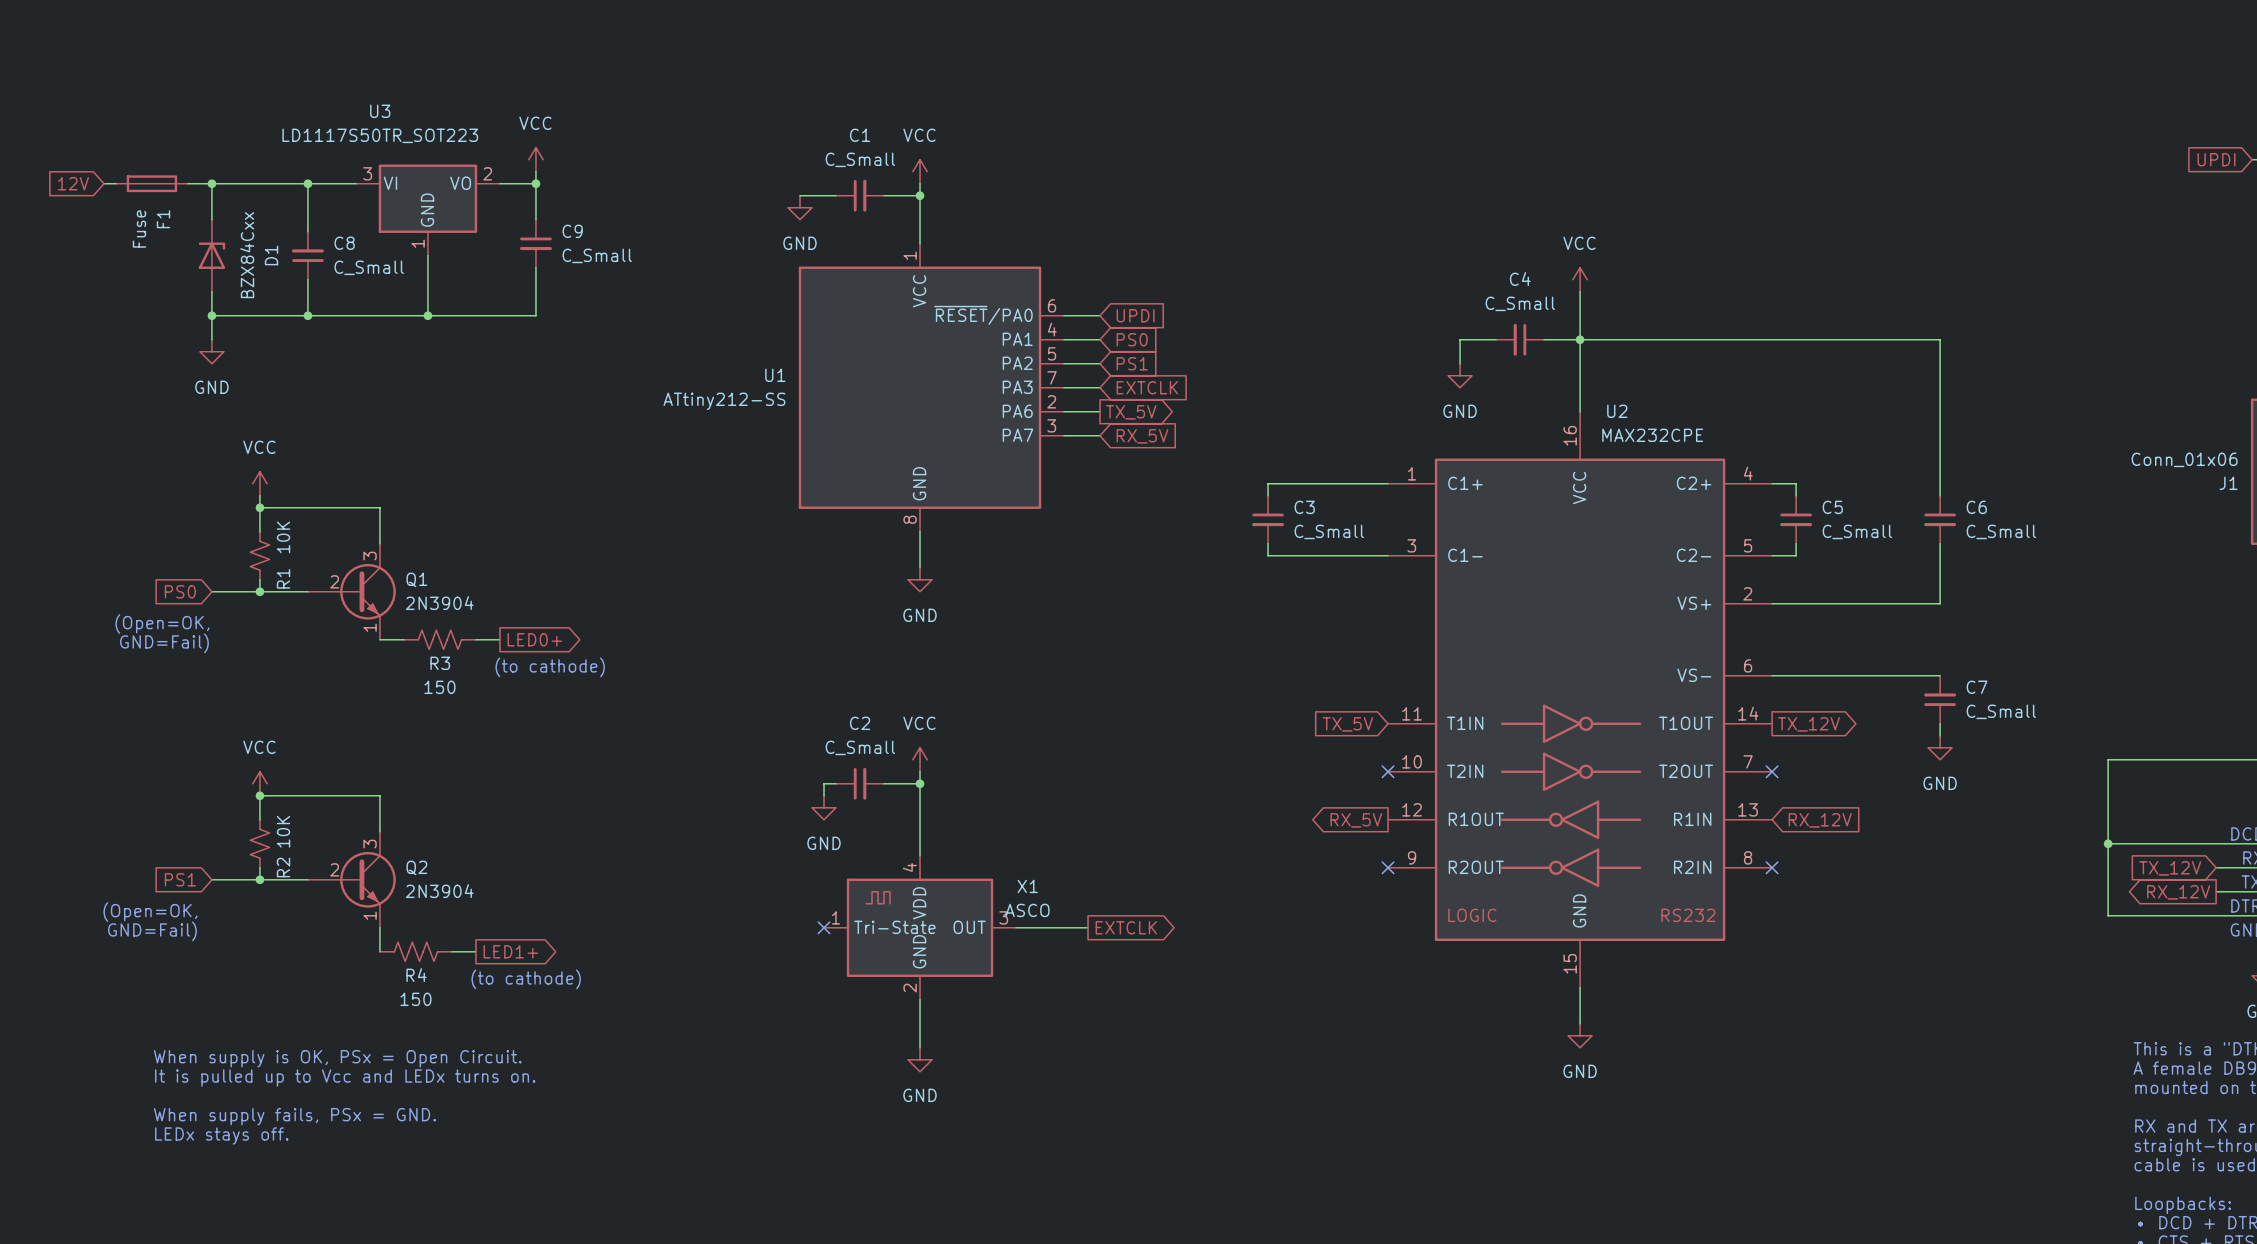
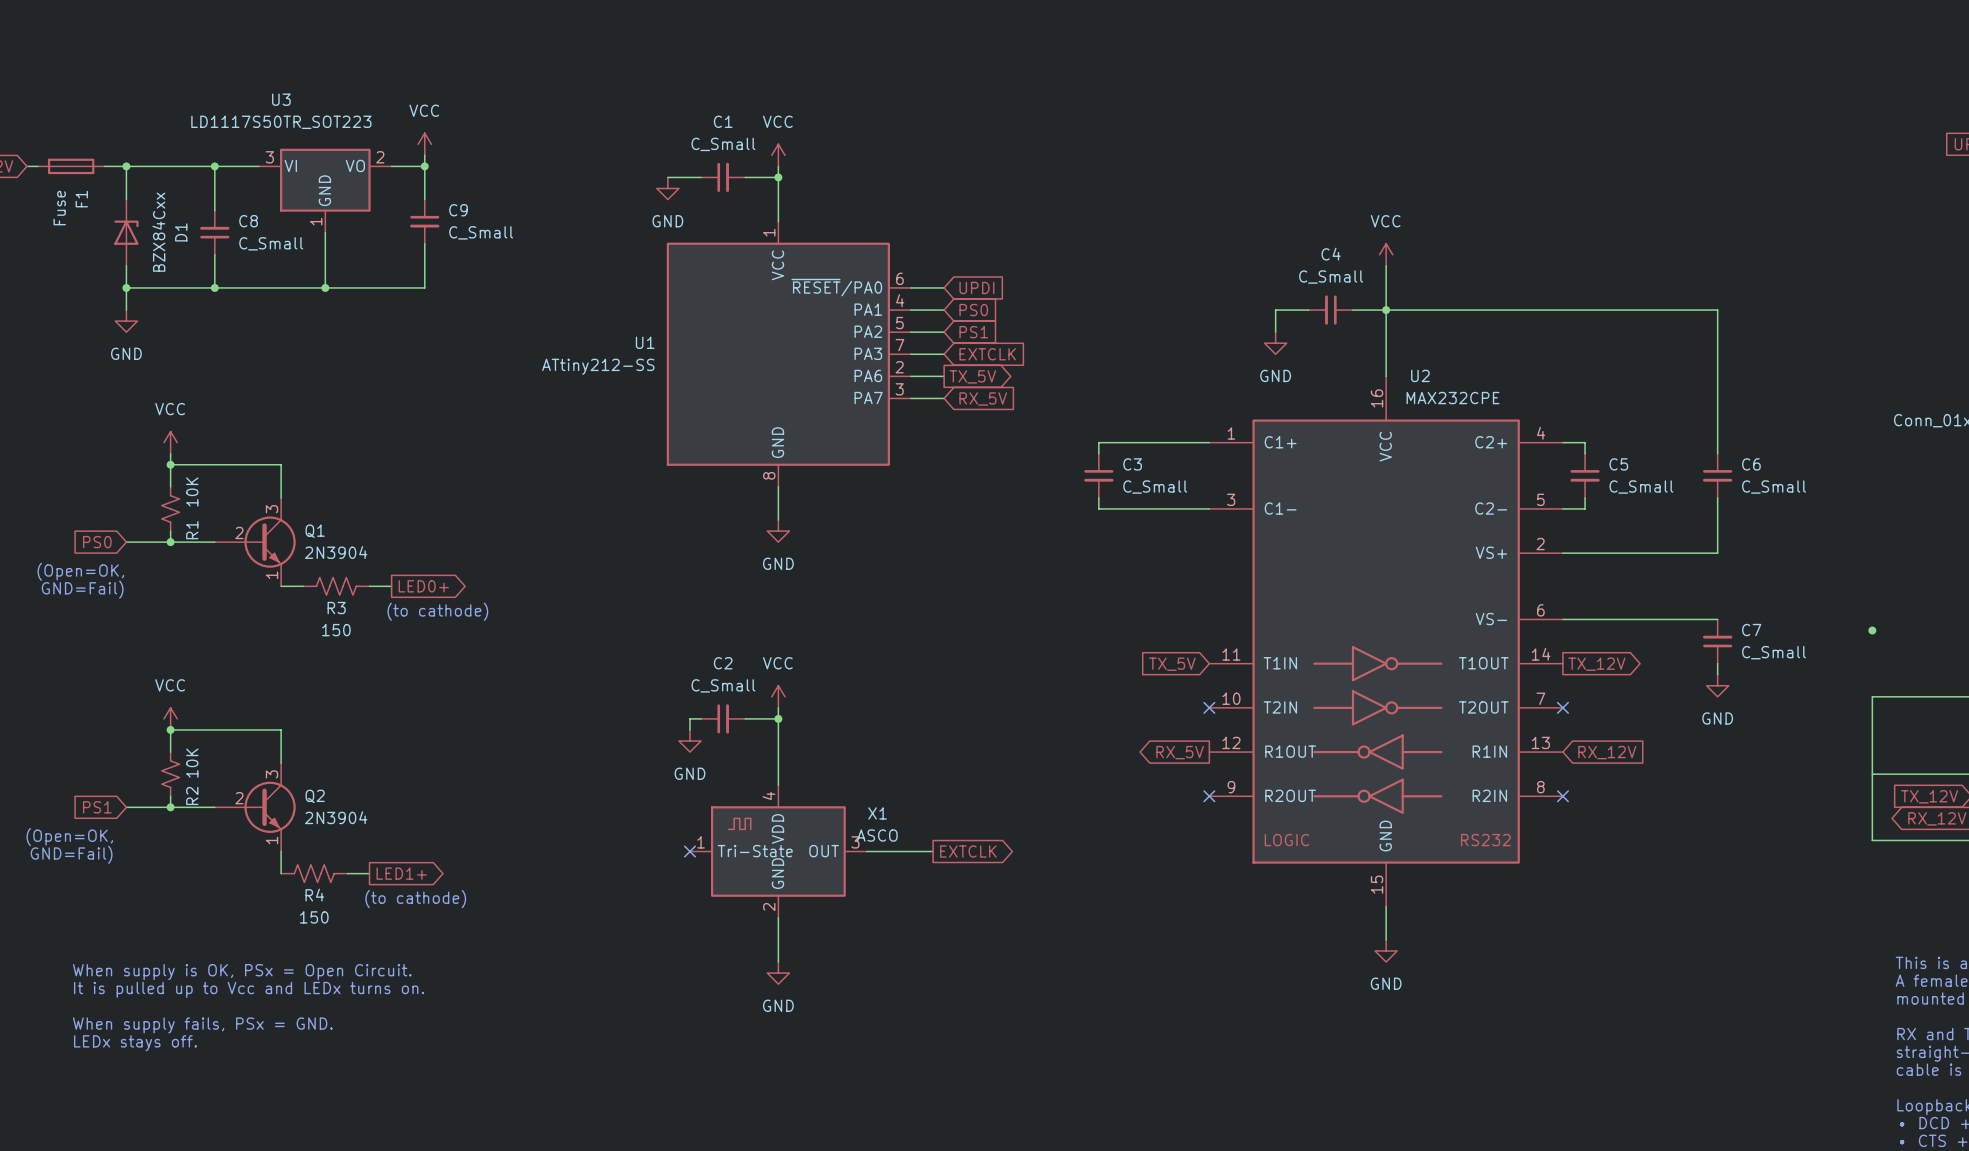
junction: none -> (1872, 630)
junction: (2108, 843) -> none

